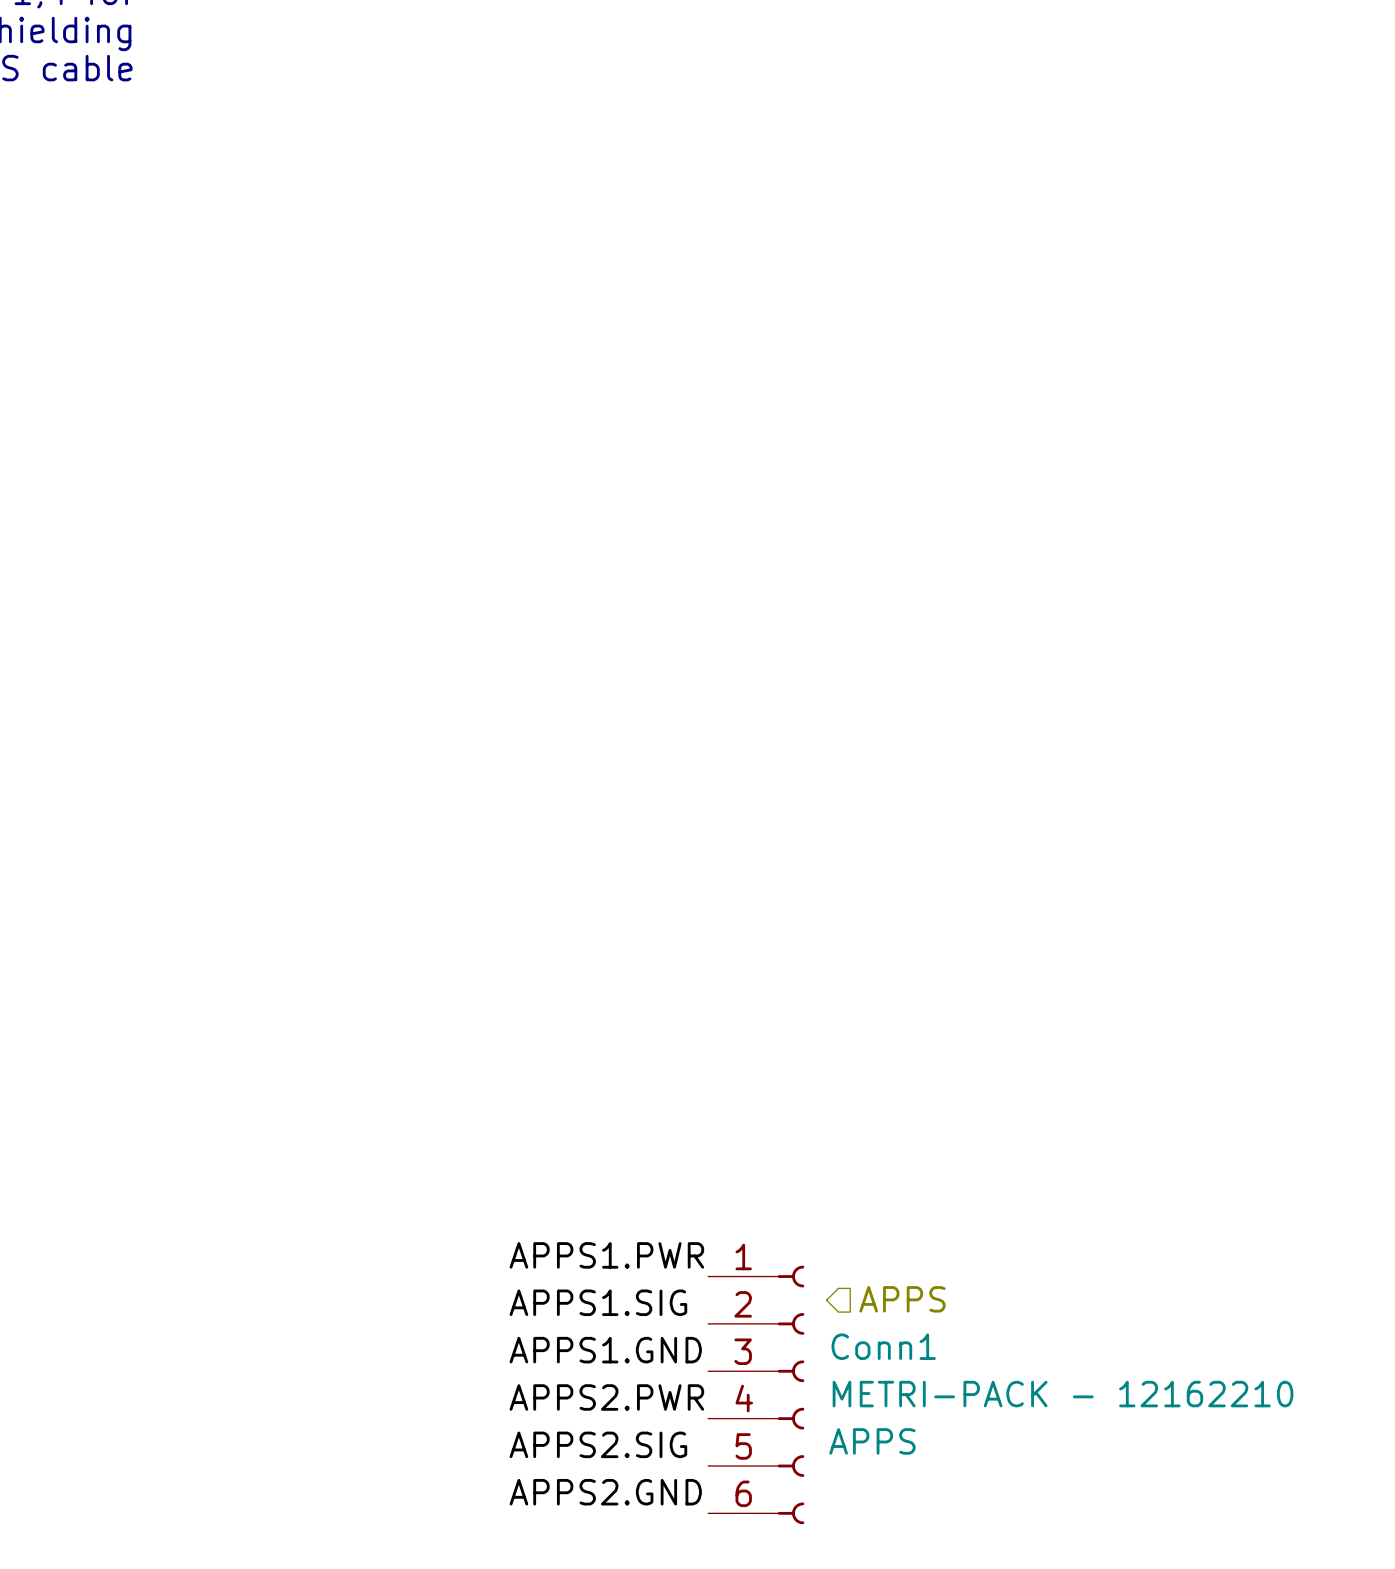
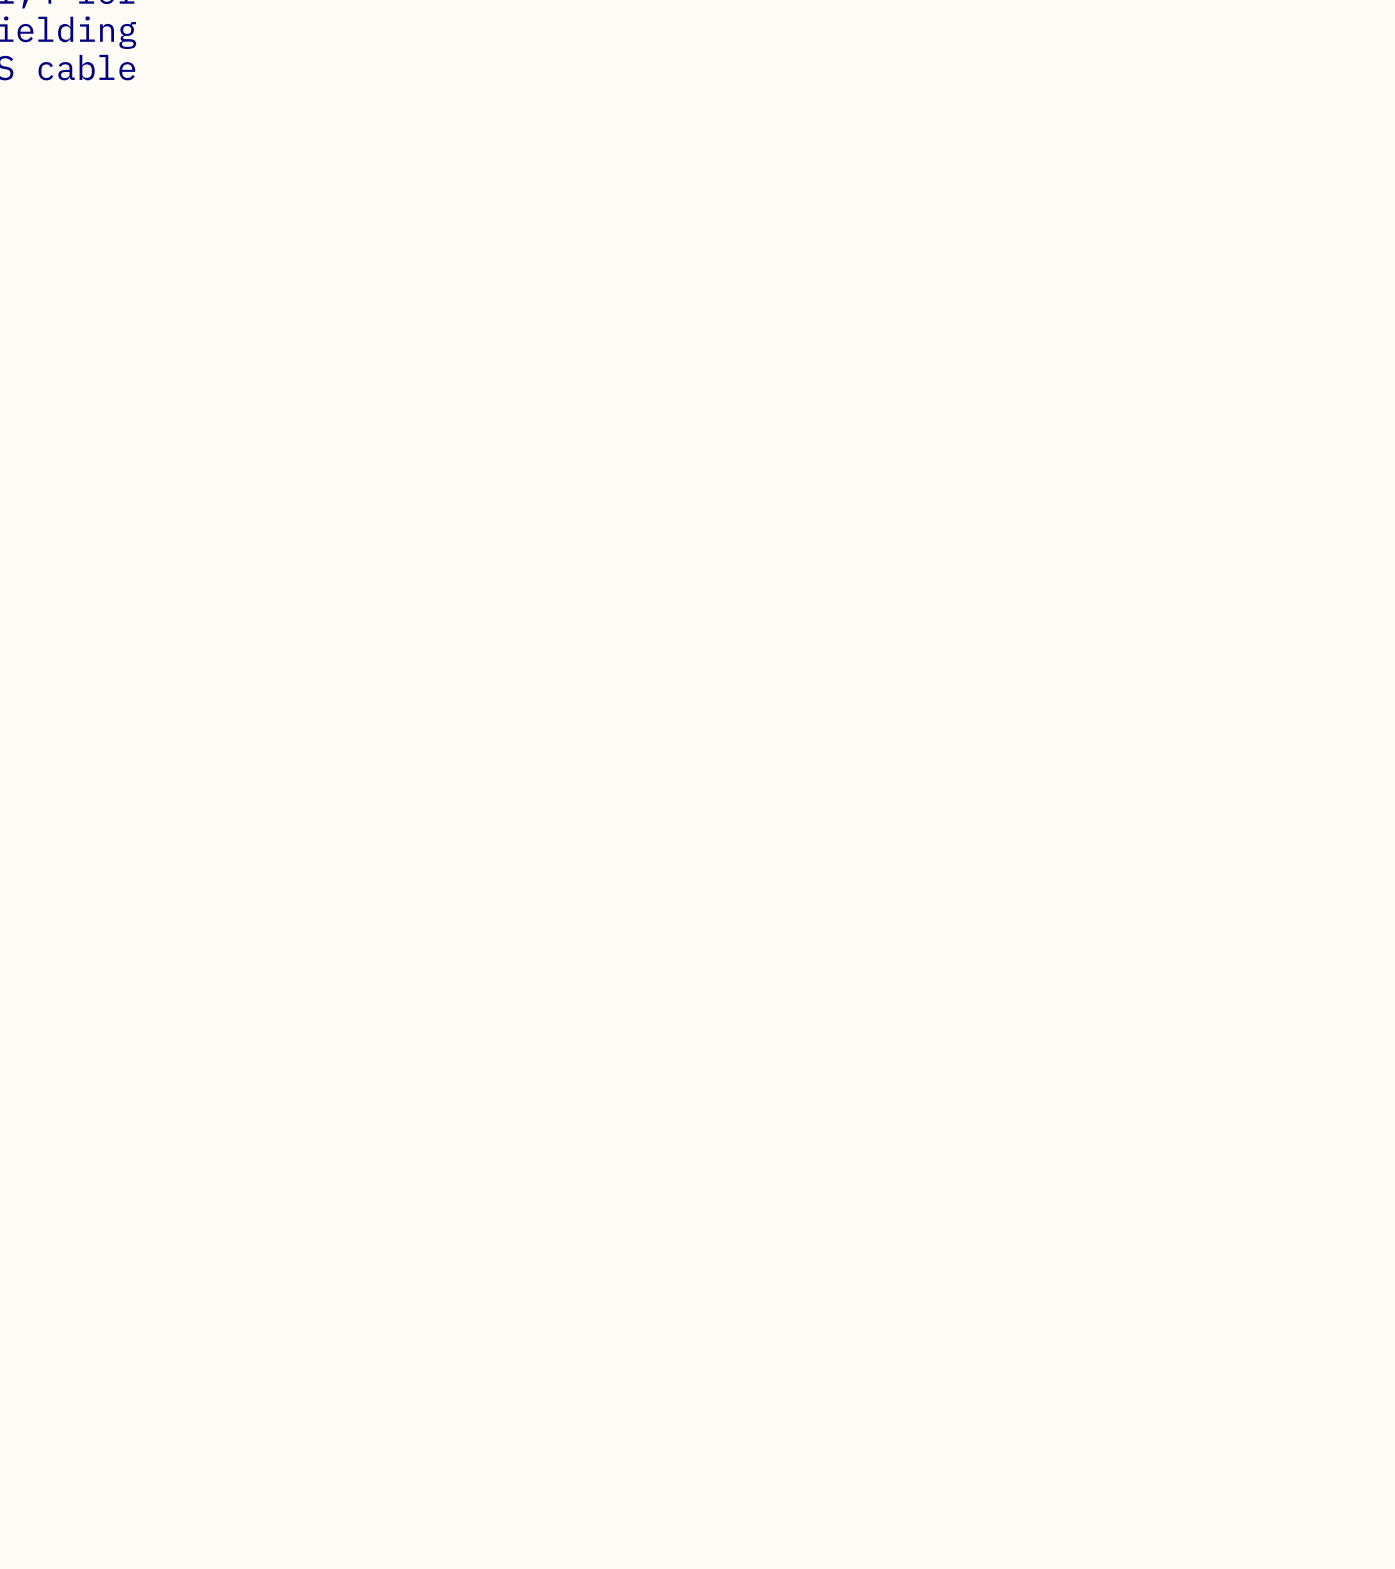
label: APPS1.PWR (606, 1255) -> none
hierarchical label: APPS (902, 1299) -> none
label: APPS1.SIG (598, 1302) -> none
label: APPS1.GND (605, 1350) -> none
Conn1: METRI-PACK - 12162210 (756, 1394) -> none
label: APPS2.PWR (606, 1397) -> none
label: APPS2.SIG (598, 1444) -> none
label: APPS2.GND (605, 1492) -> none

